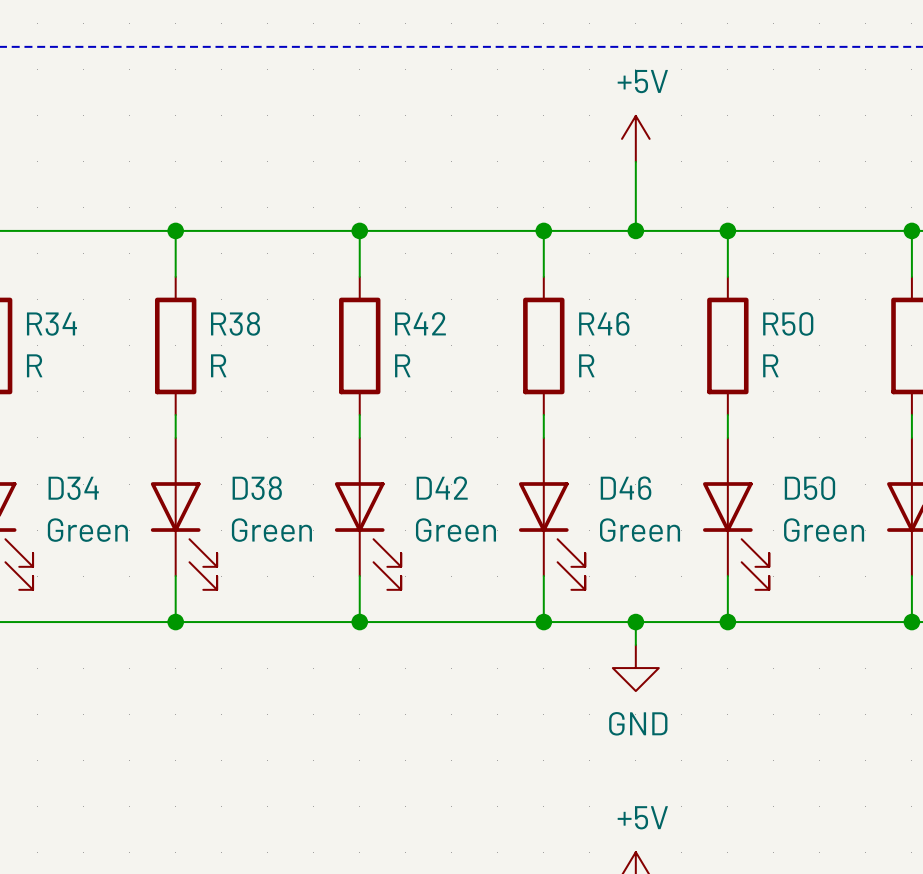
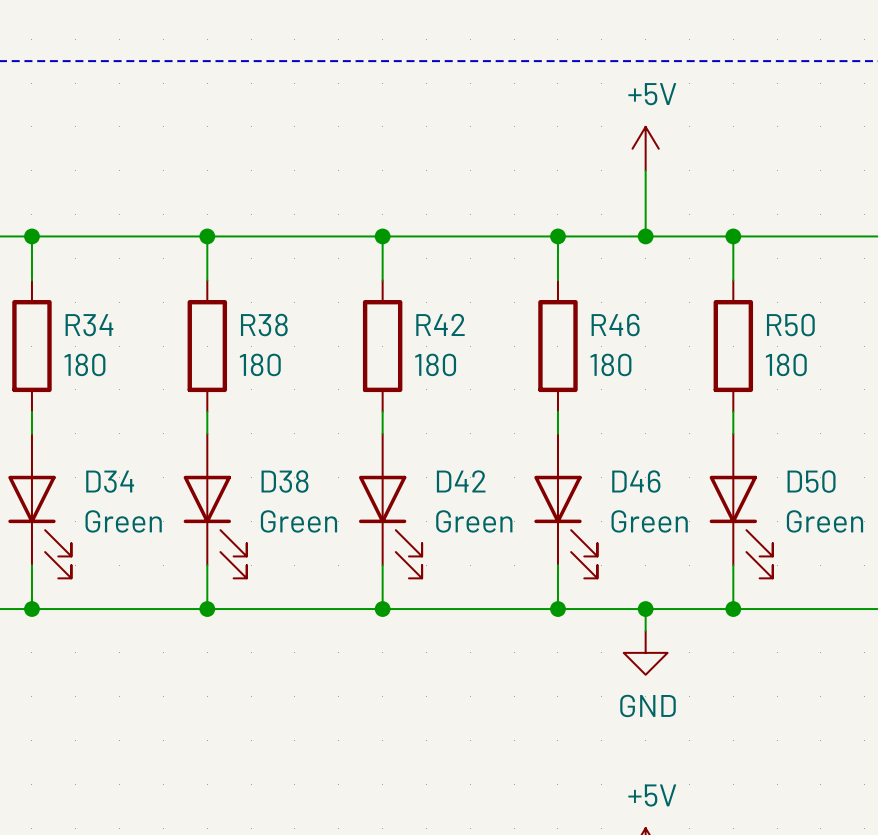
R34 value: R (34, 365) -> 180 (84, 364)
R38 value: R (218, 365) -> 180 (260, 364)
R42 value: R (402, 365) -> 180 (435, 364)
R46 value: R (586, 365) -> 180 (610, 364)
R50 value: R (770, 365) -> 180 (786, 364)

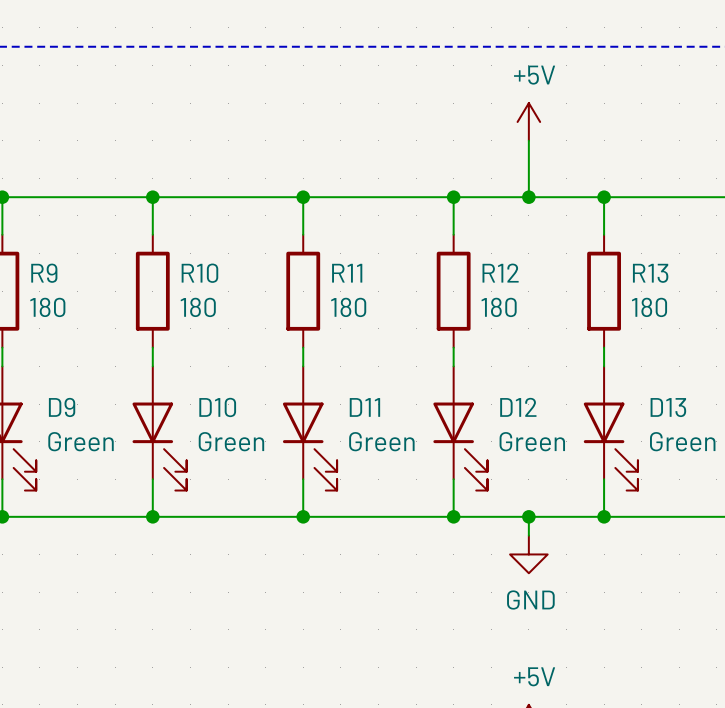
R42 name: R42 (440, 324) -> R11 (347, 273)
R34 name: R34 (89, 325) -> R9 (44, 273)
R38 name: R38 (264, 325) -> R10 (199, 273)
R46 name: R46 (615, 325) -> R12 (500, 273)
R50 name: R50 (790, 325) -> R13 (650, 273)
D34 name: D34 (110, 481) -> D9 (62, 407)
D38 name: D38 (285, 481) -> D10 (217, 407)
D42 name: D42 (461, 481) -> D11 (364, 407)
D46 name: D46 (636, 481) -> D12 (518, 407)
D50 name: D50 (811, 481) -> D13 (668, 407)

